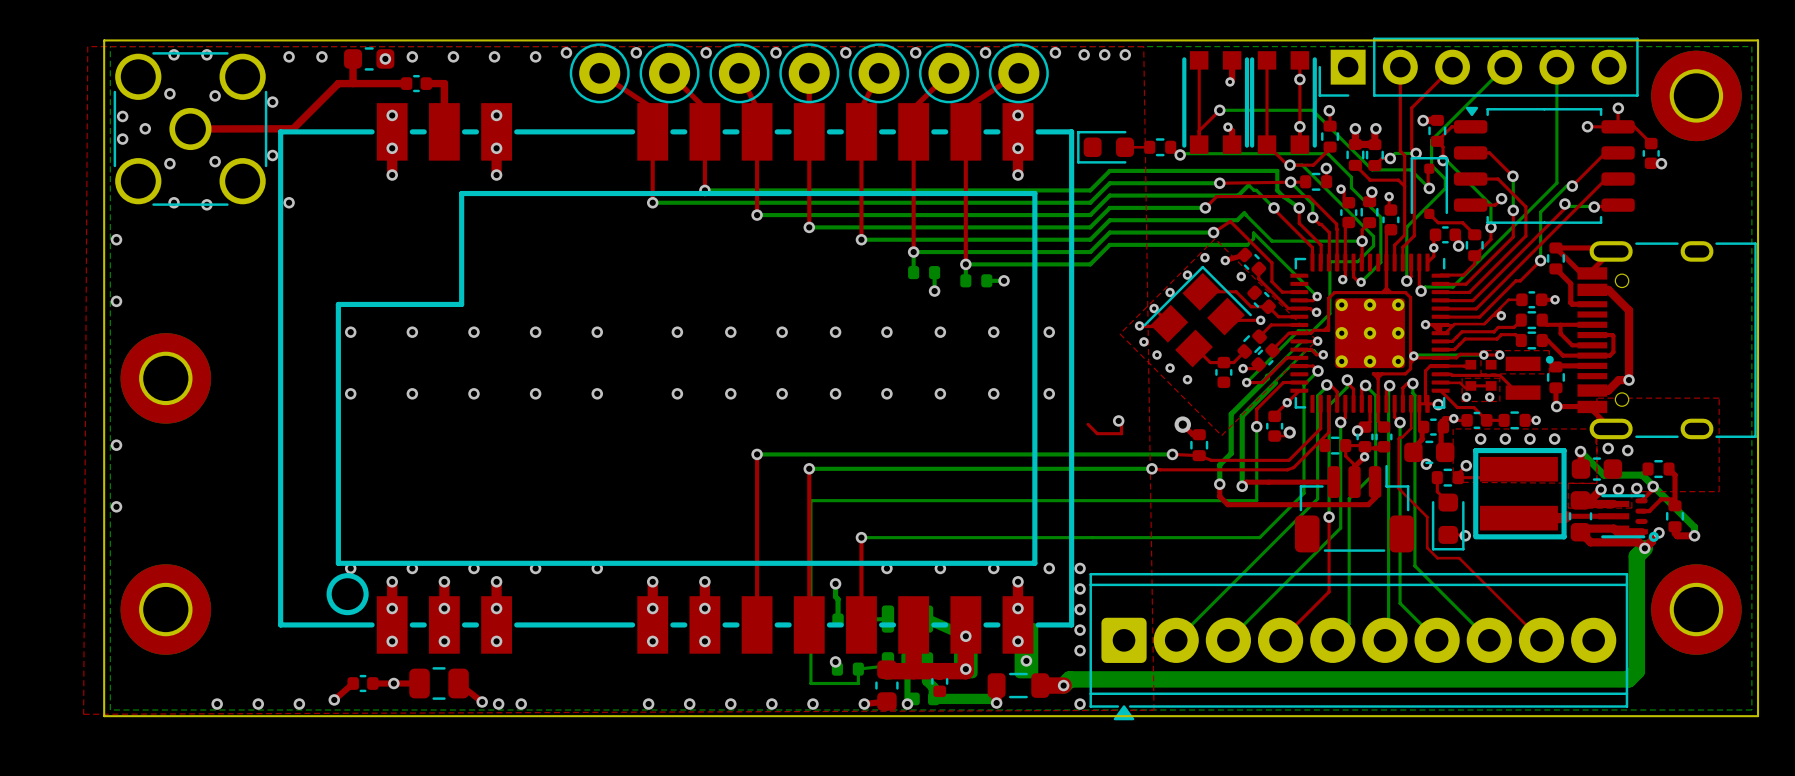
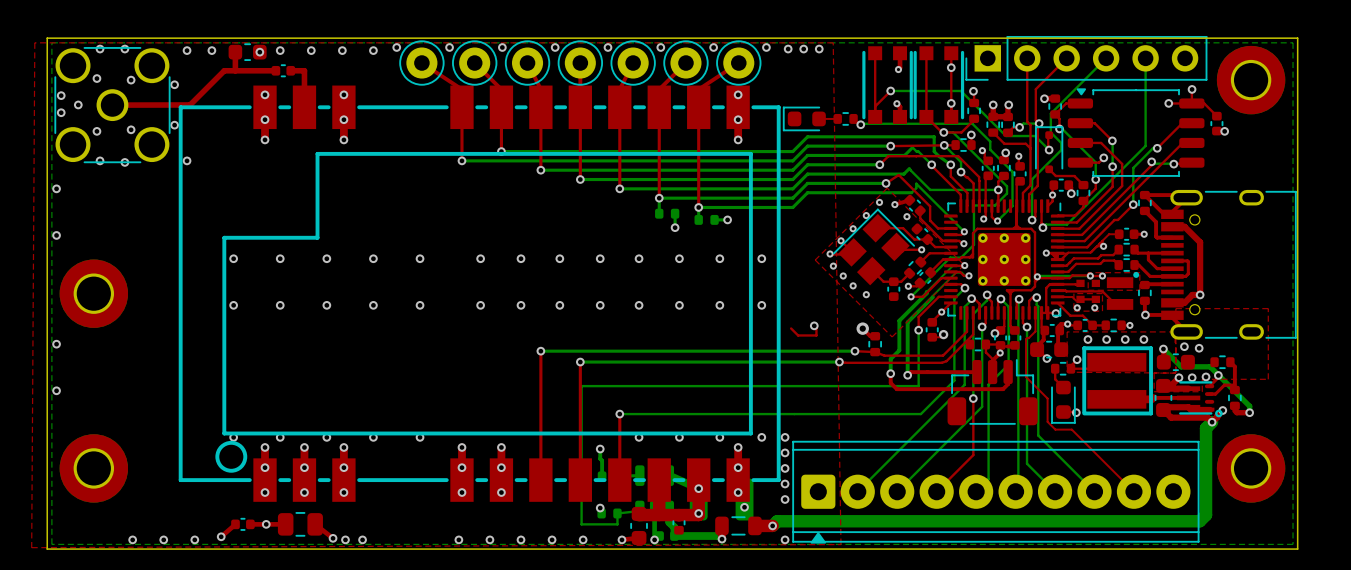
part footprint: [1505, 355, 1554, 400] -> [1106, 271, 1140, 310]
part footprint: [1089, 572, 1629, 721] -> [792, 440, 1200, 544]

